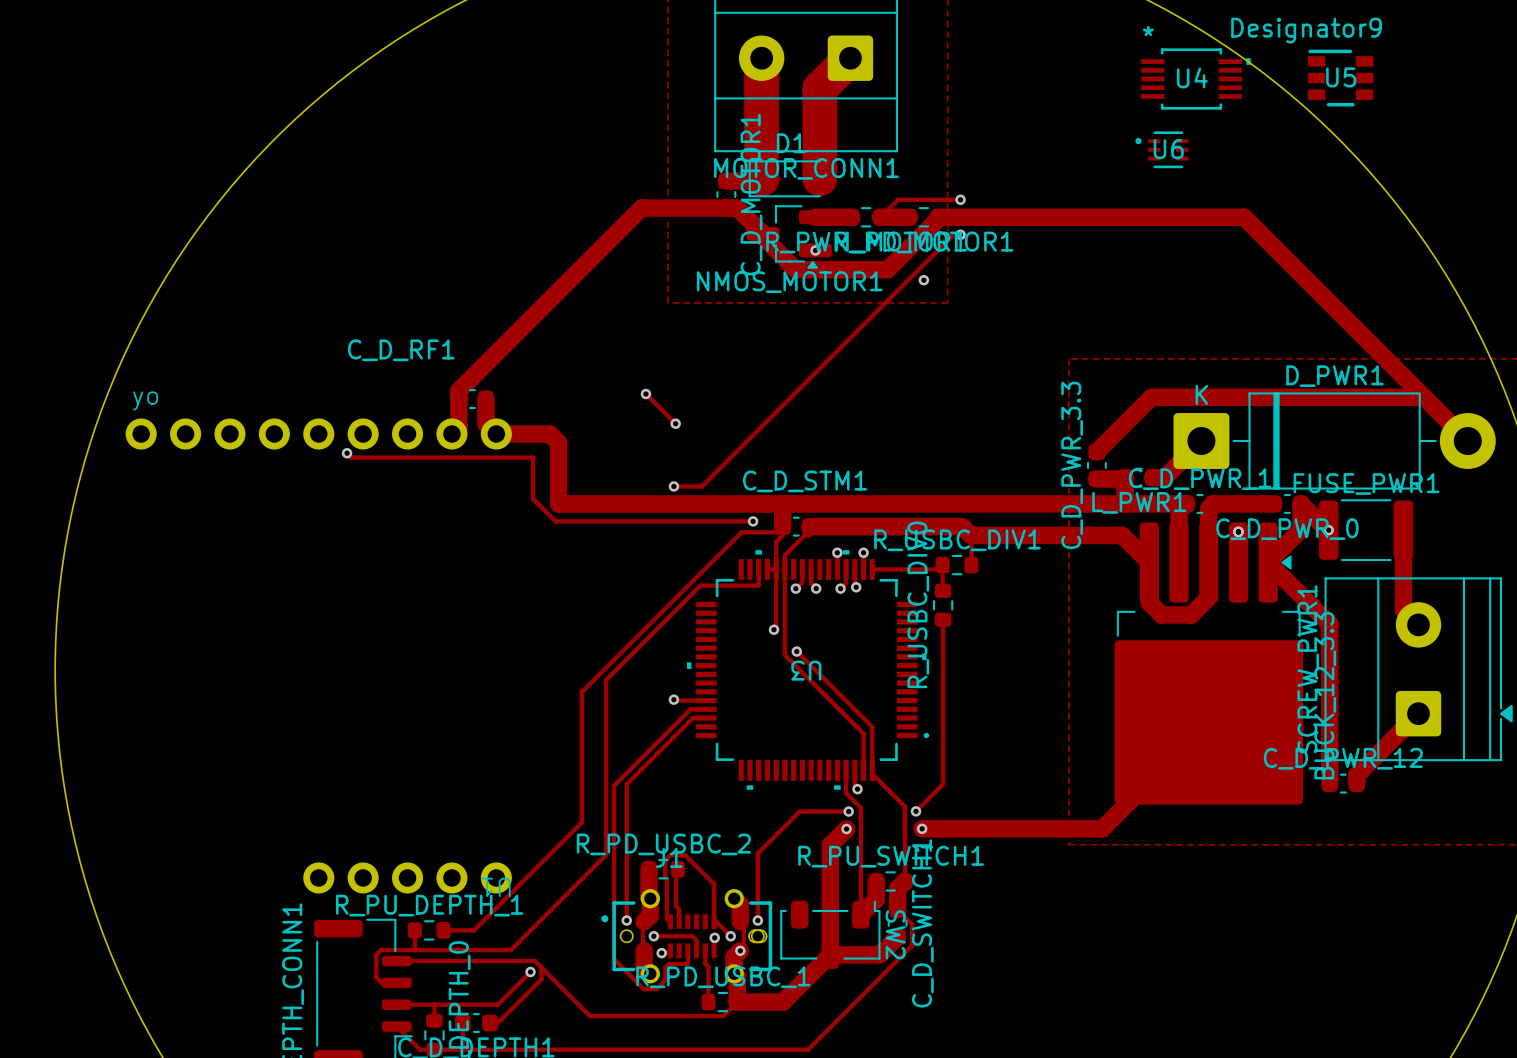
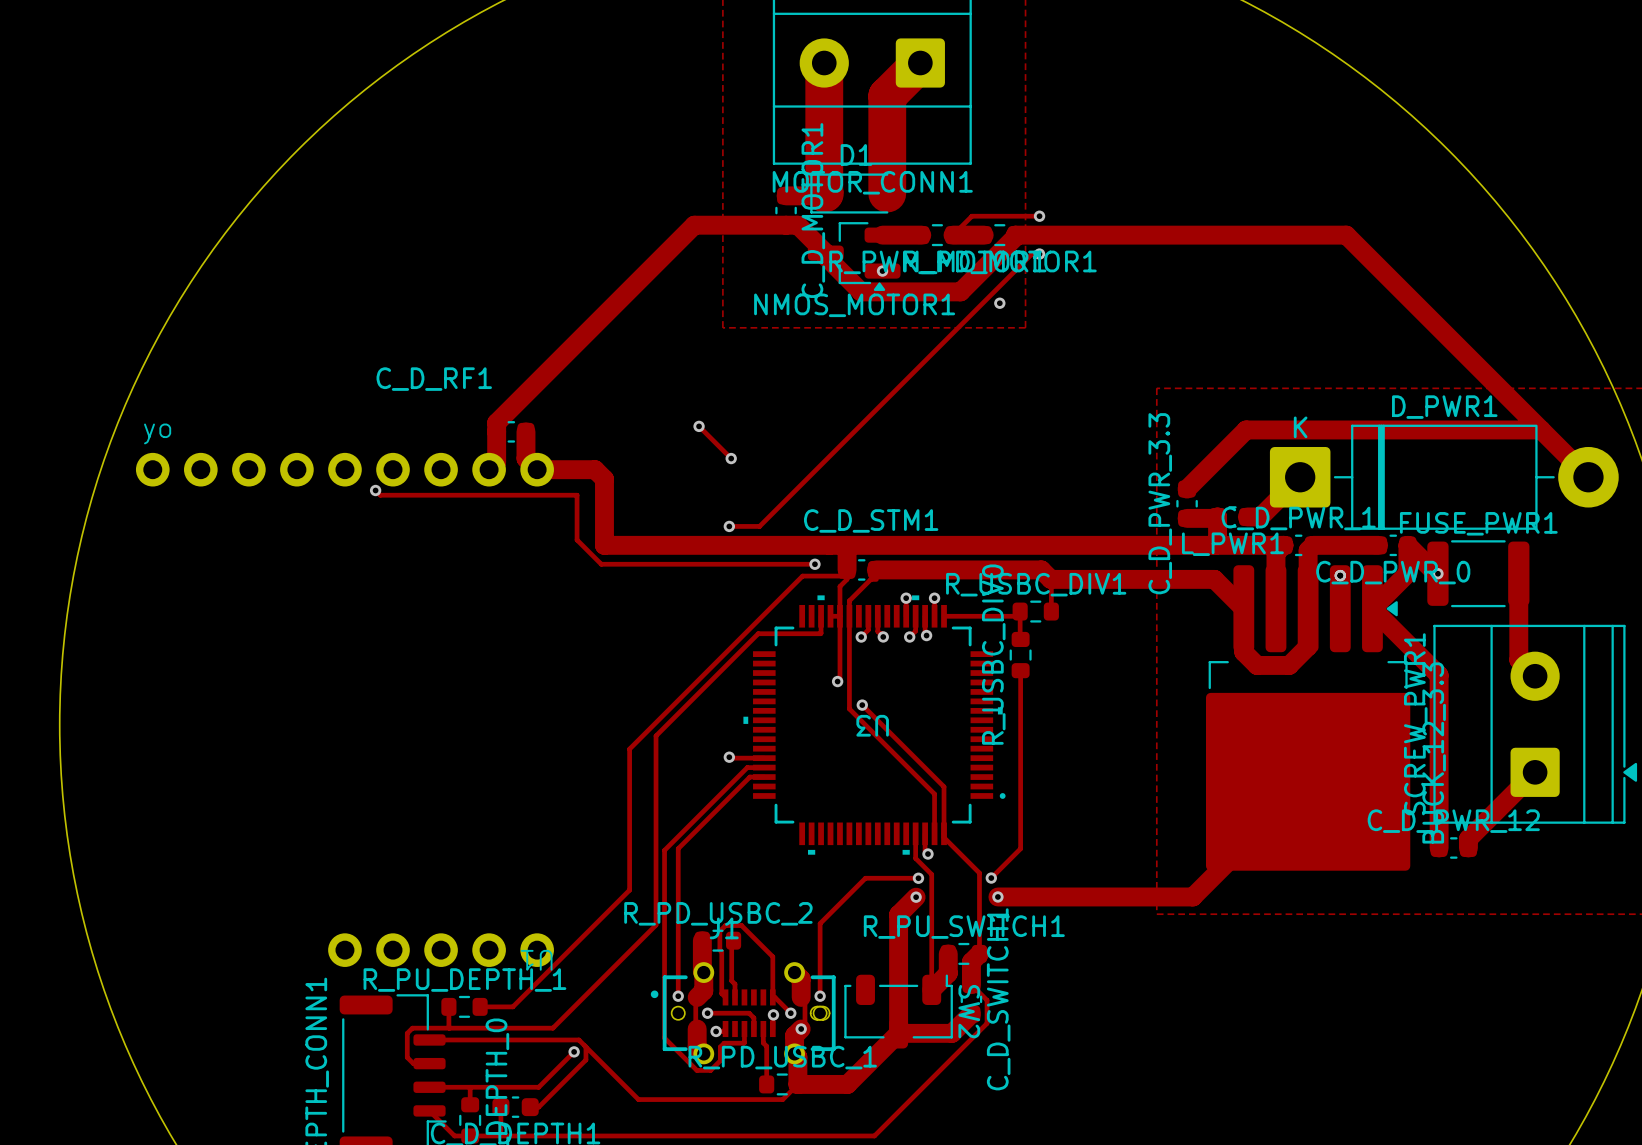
U5: (1340, 78) -> none
U4: (1195, 79) -> none
U6: (1161, 149) -> none

